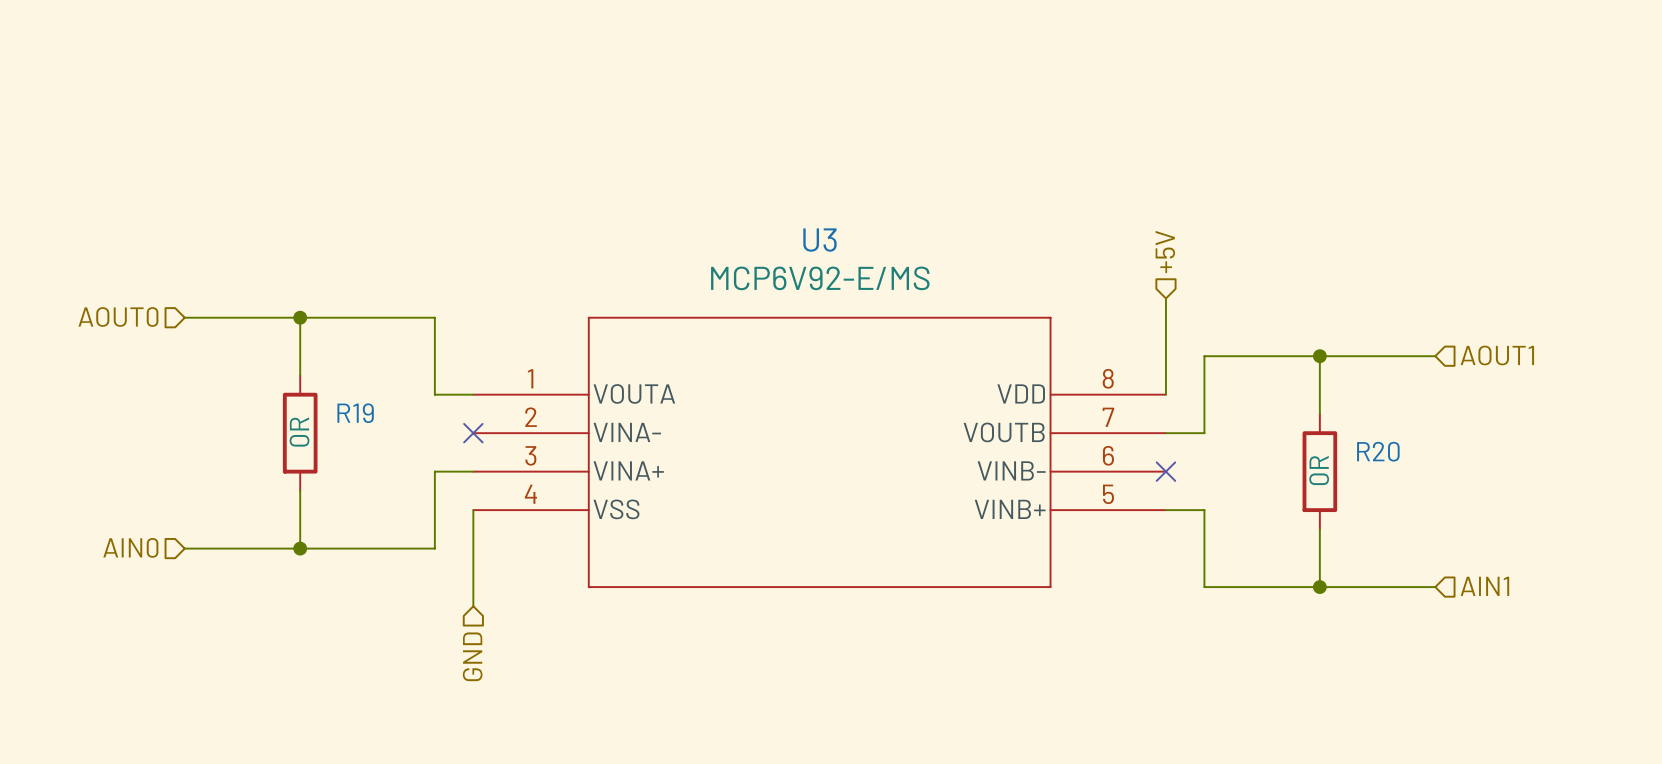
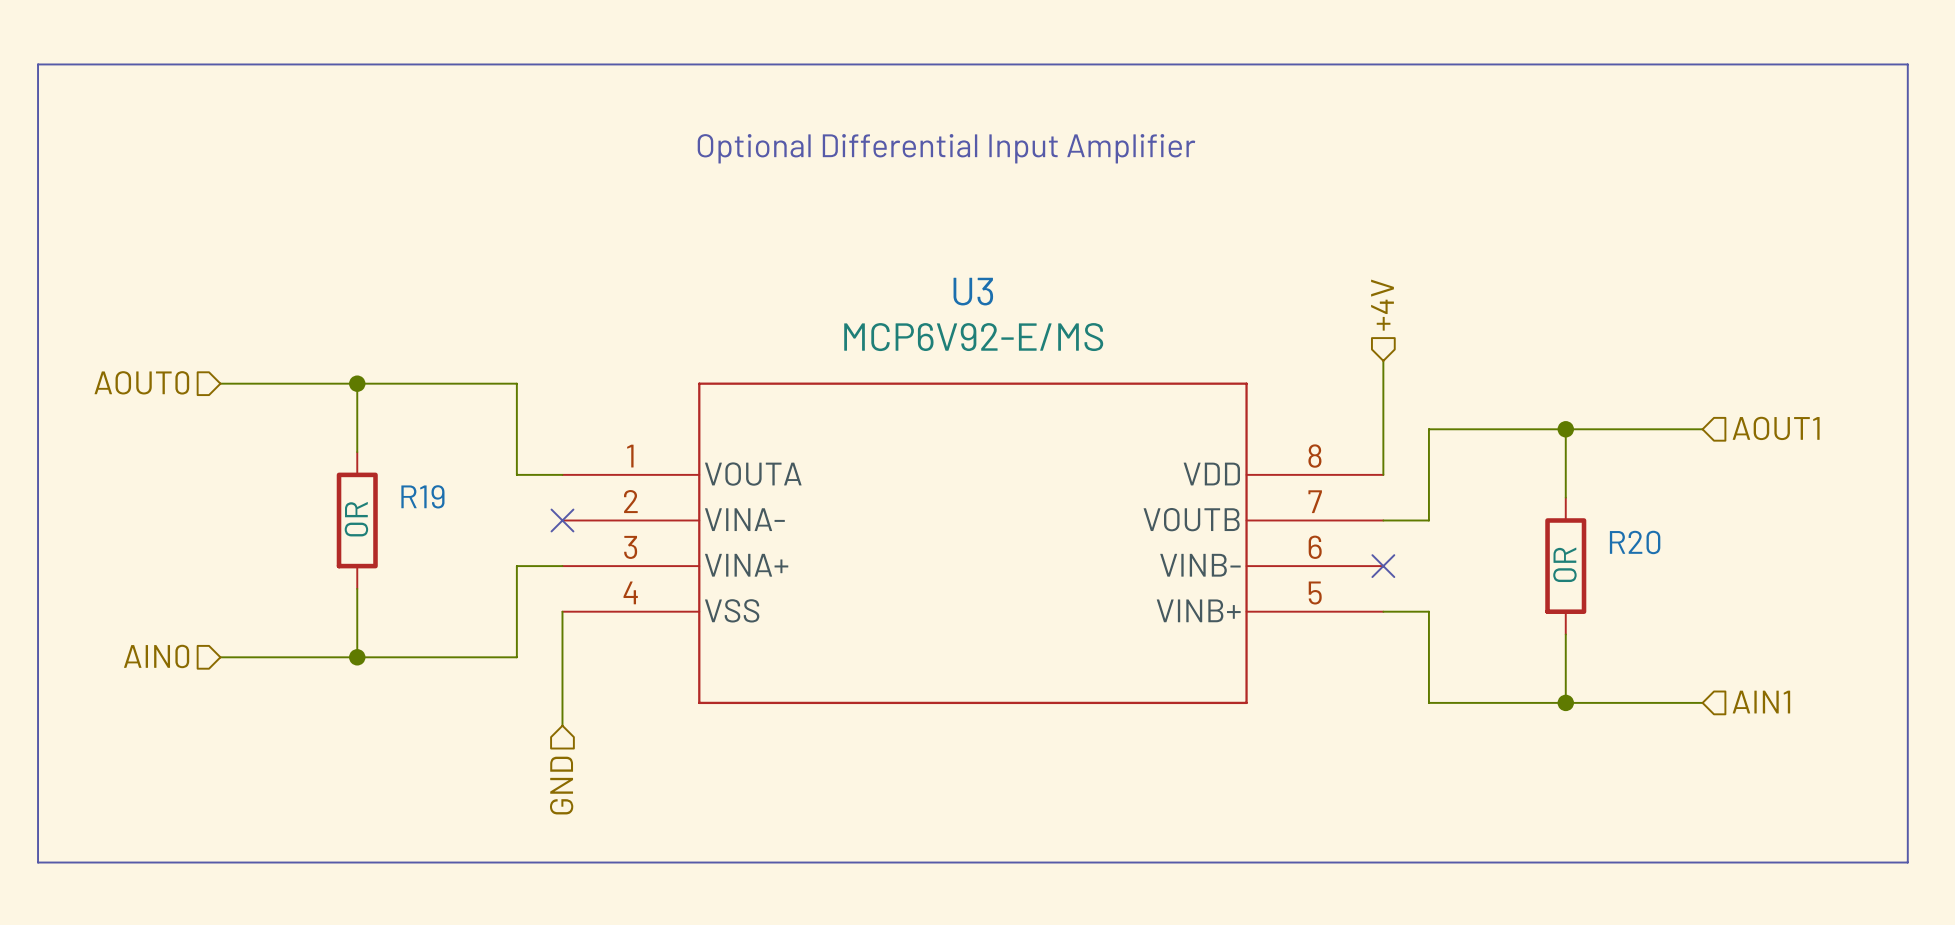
line: none -> (38, 64) (1907, 64) (1907, 862) (38, 862) (38, 64)
text: none -> Optional Differential Input Amplifier (946, 148)
hierarchical label: +5V (1165, 251) -> +4V (1382, 305)

